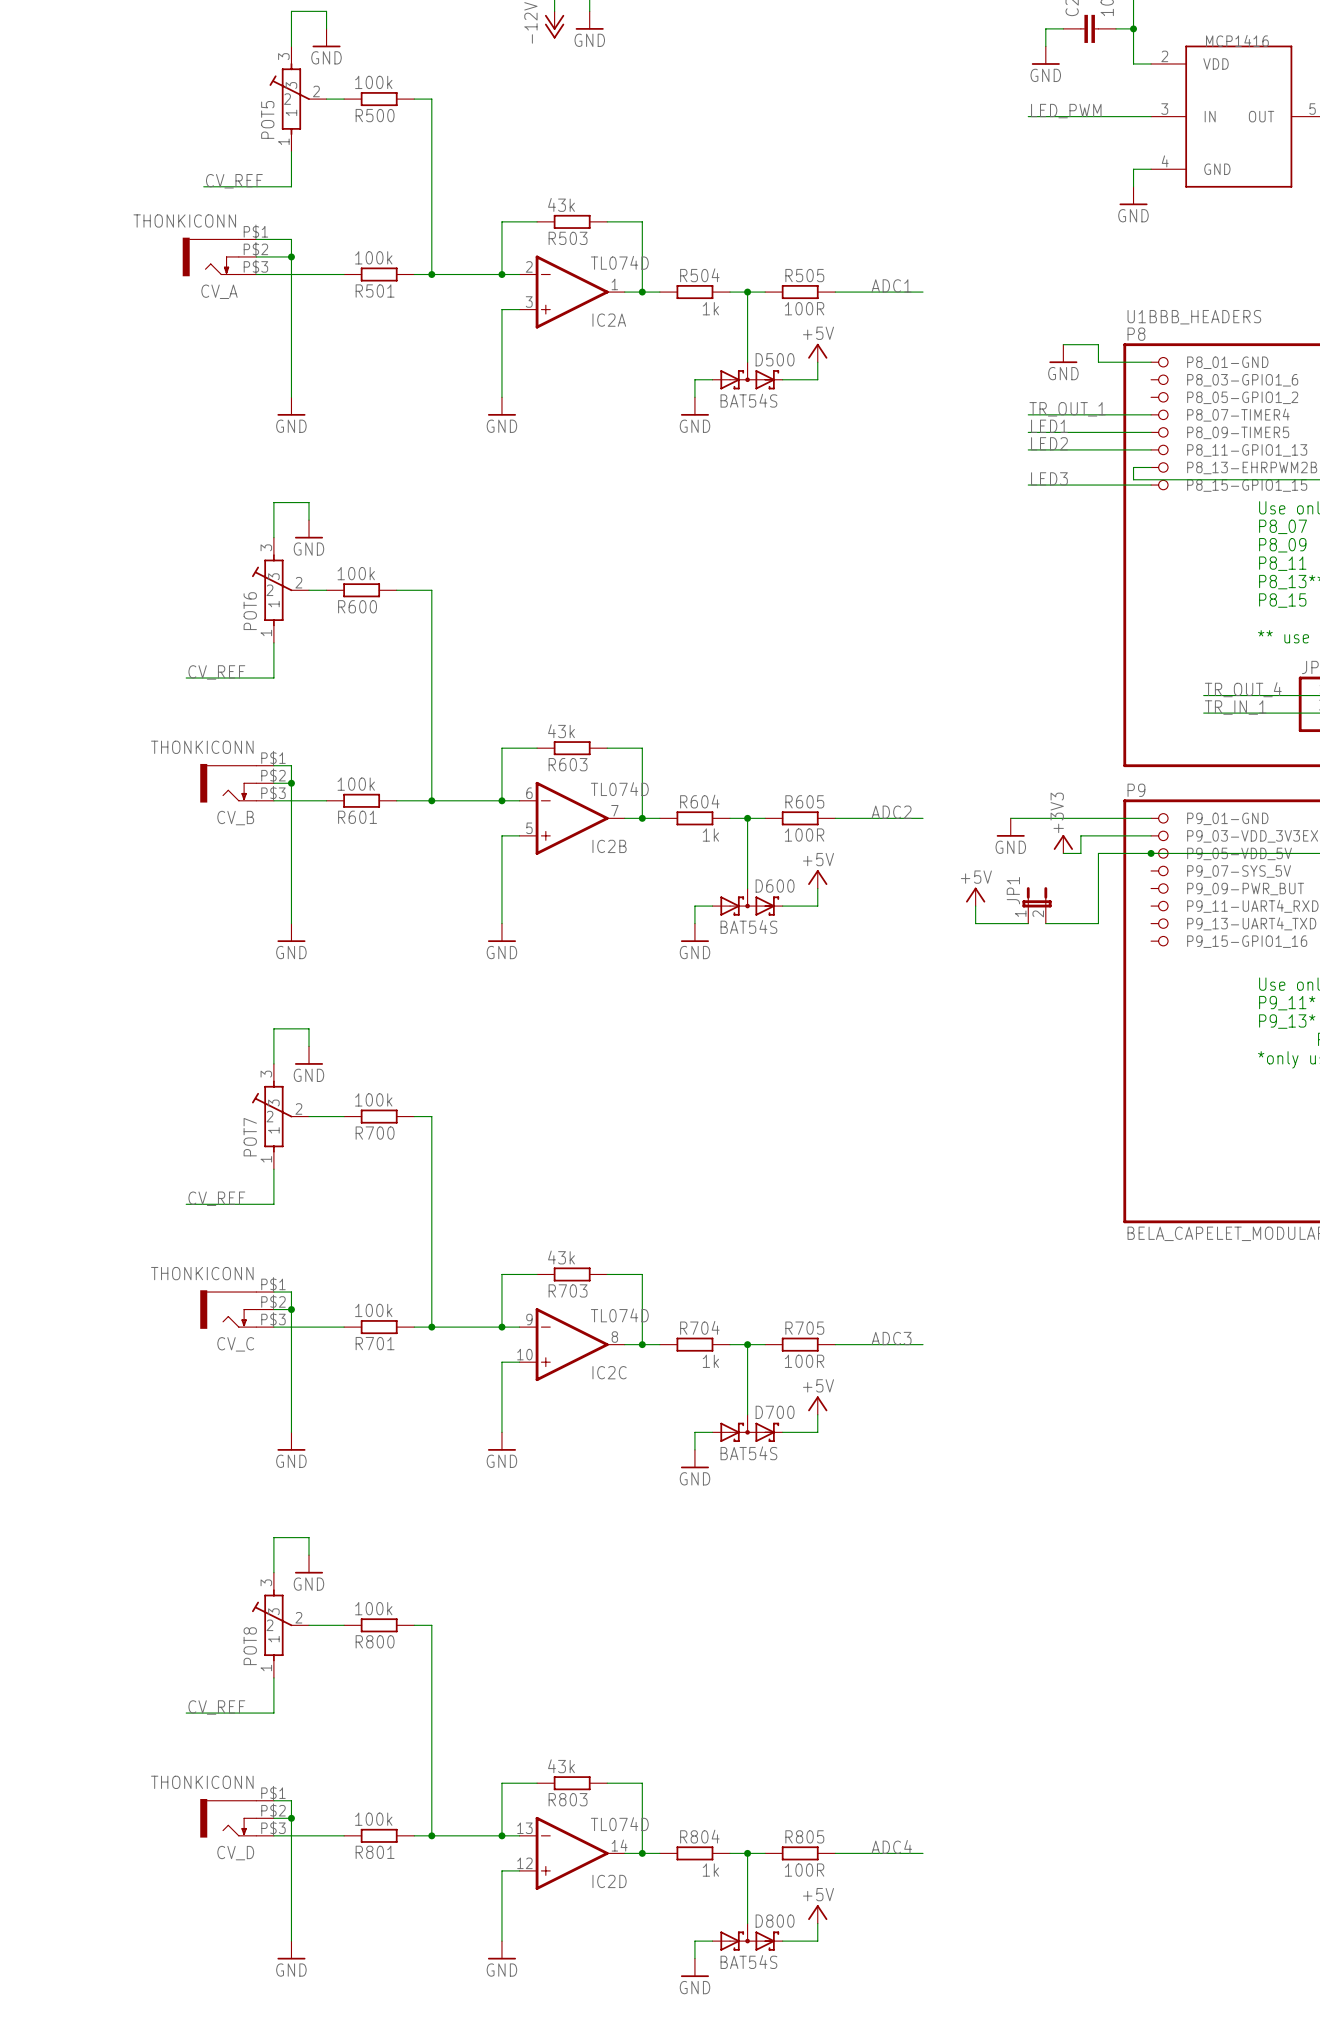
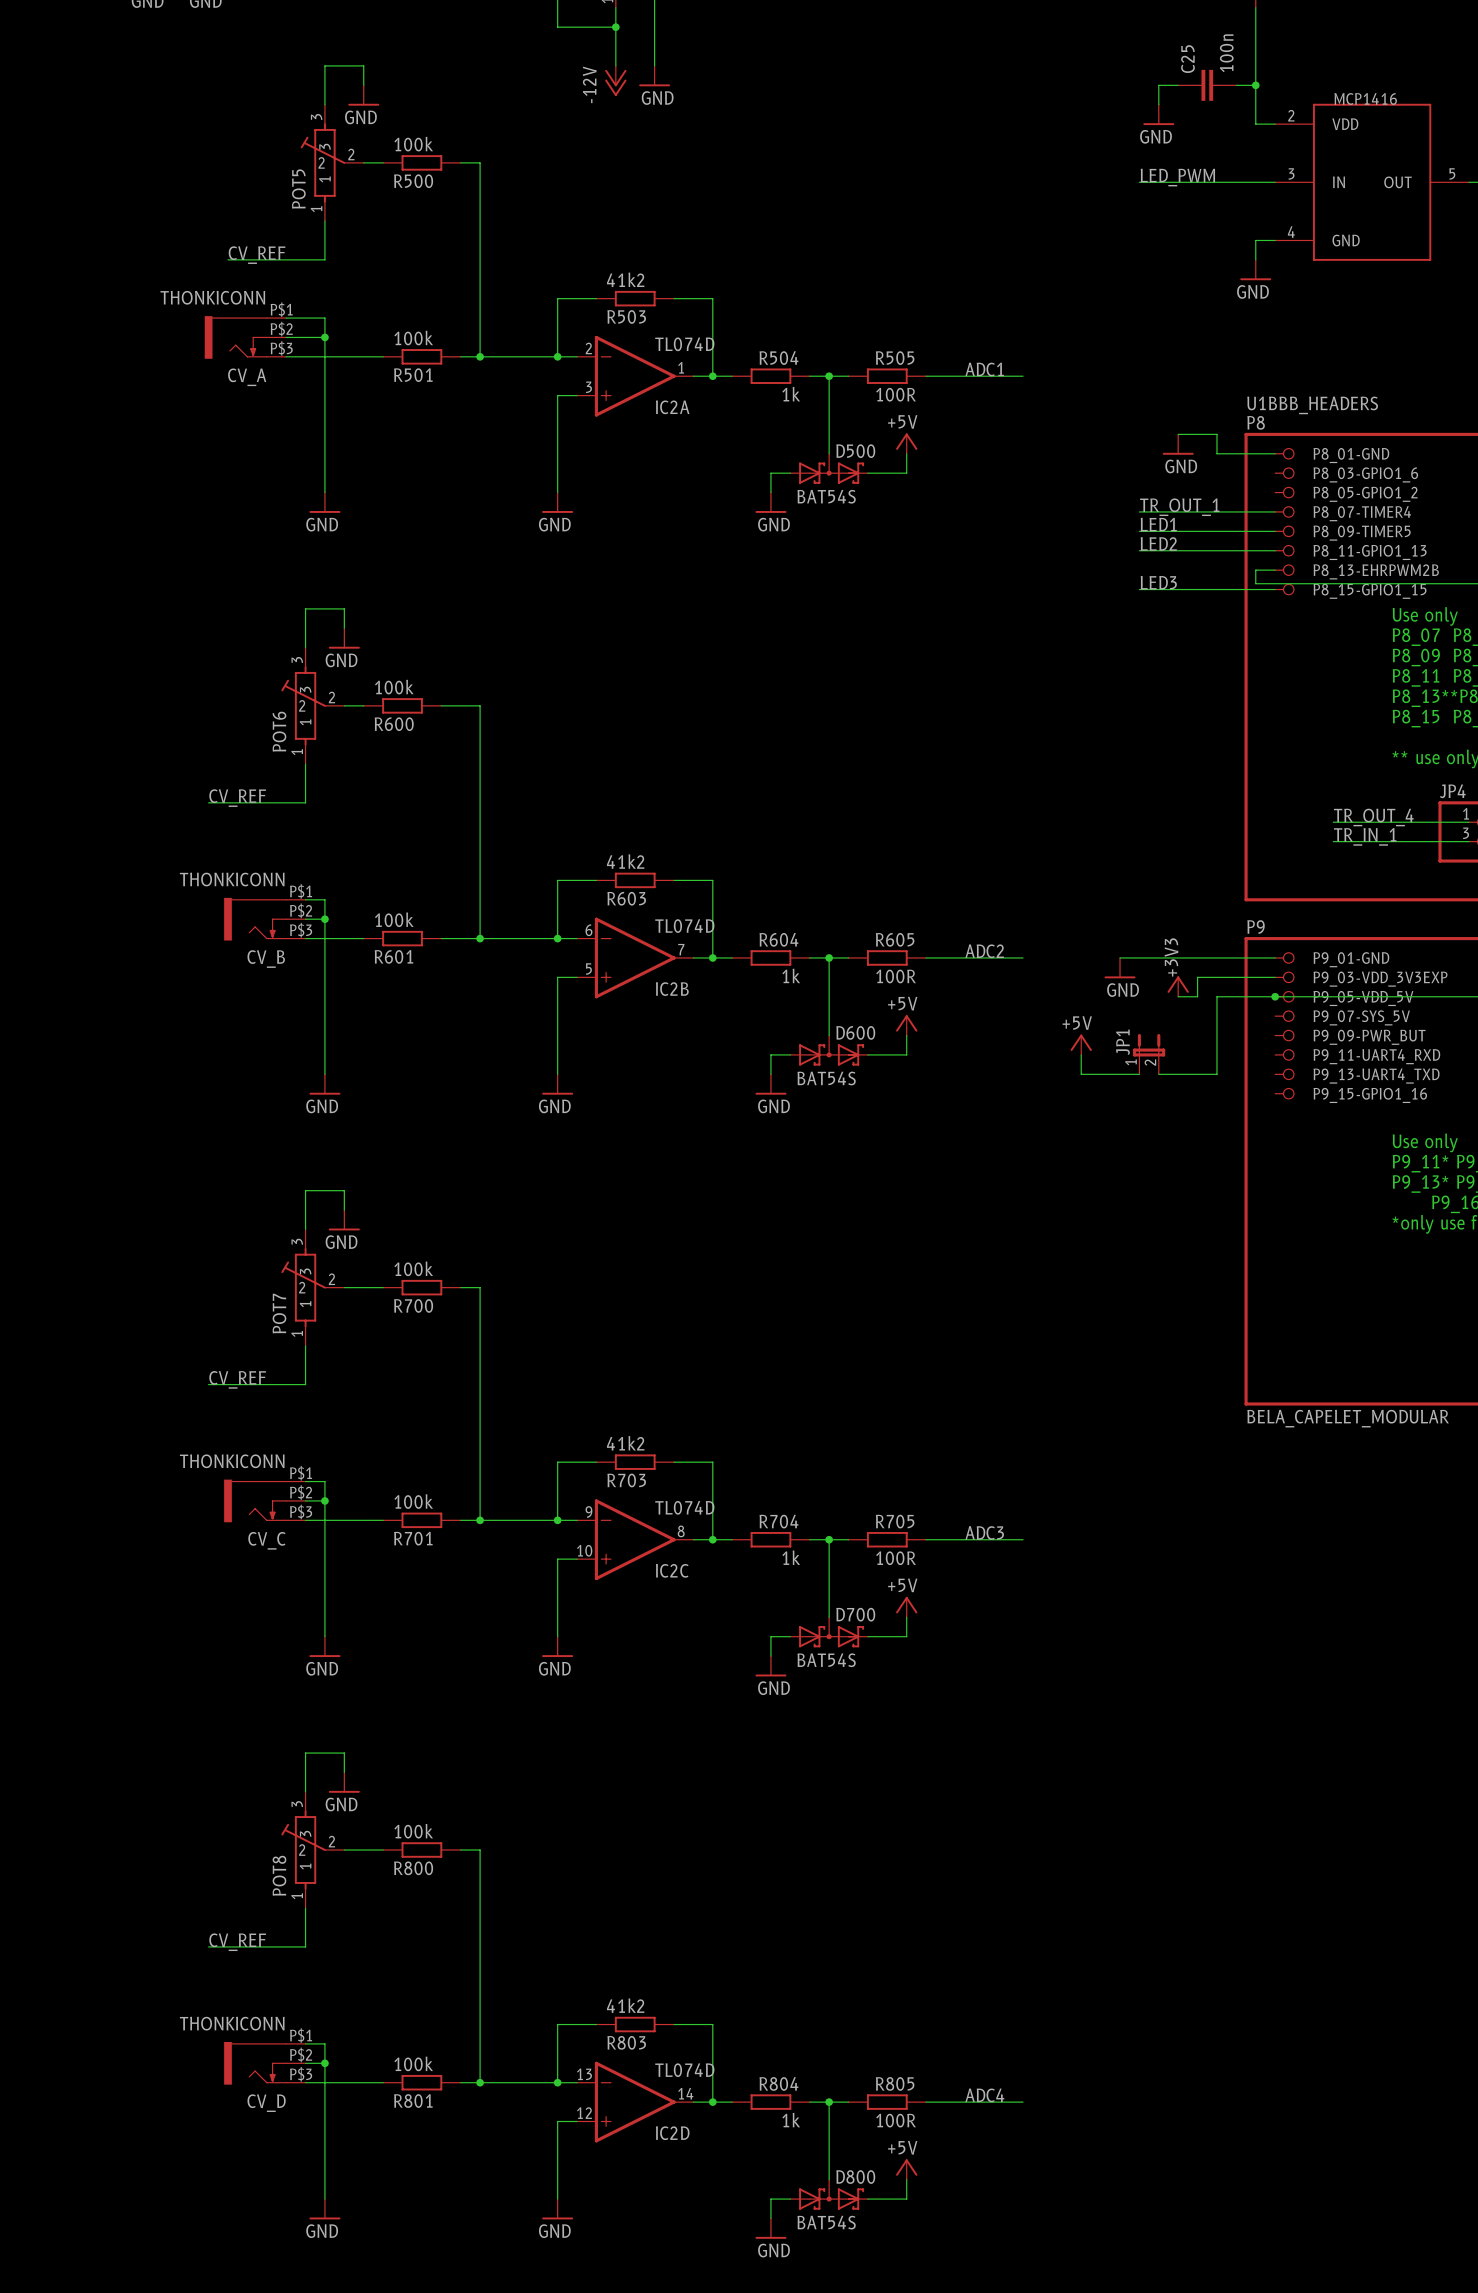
R503 value: 43k (561, 204) -> 41k2 (625, 279)
R603 value: 43k (561, 731) -> 41k2 (625, 861)
R703 value: 43k (561, 1257) -> 41k2 (625, 1443)
R803 value: 43k (561, 1766) -> 41k2 (625, 2005)

